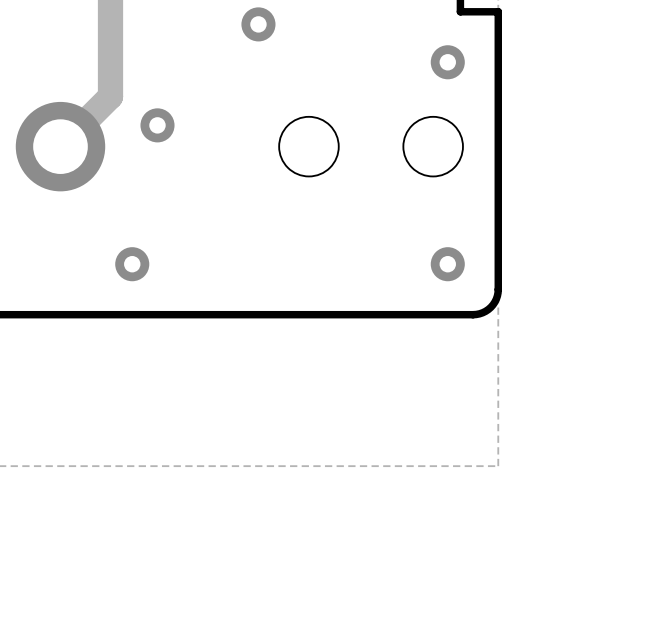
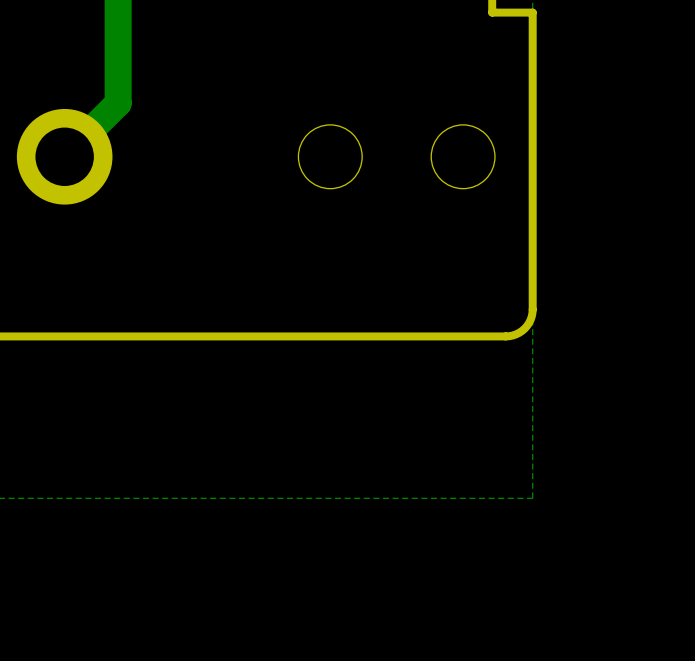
part: (258, 24) -> none
part: (447, 62) -> none
part: (157, 125) -> none
part: (132, 264) -> none
part: (447, 264) -> none

